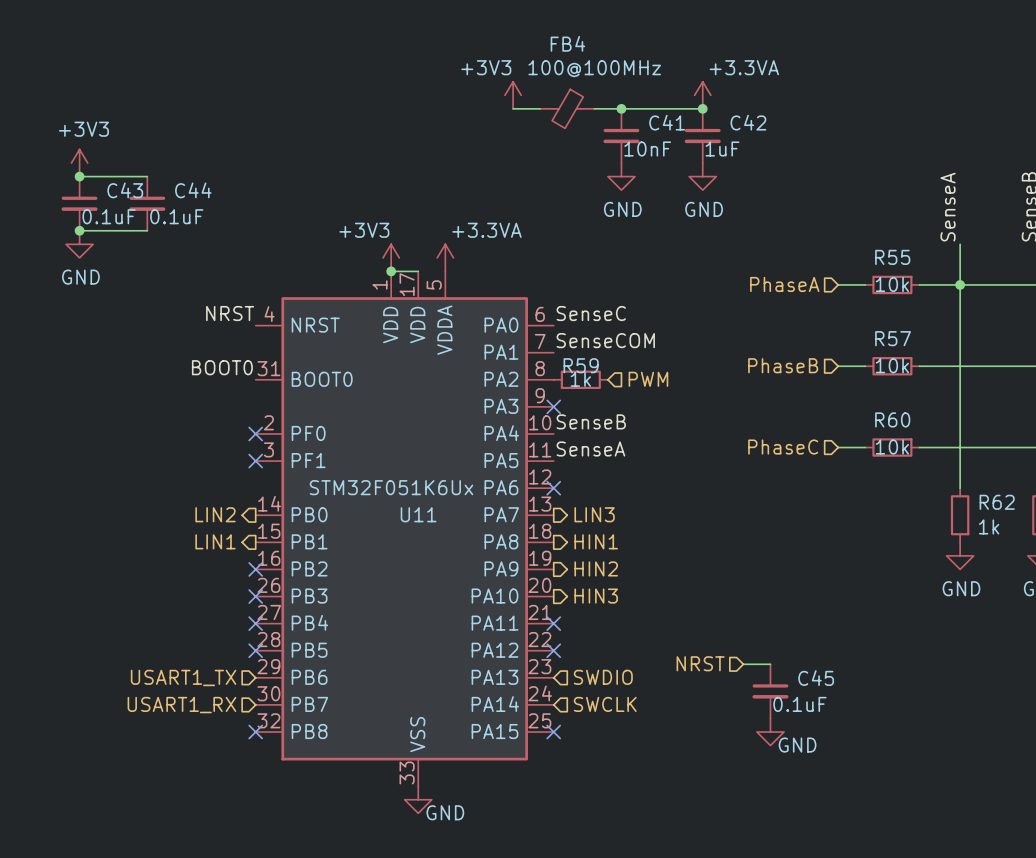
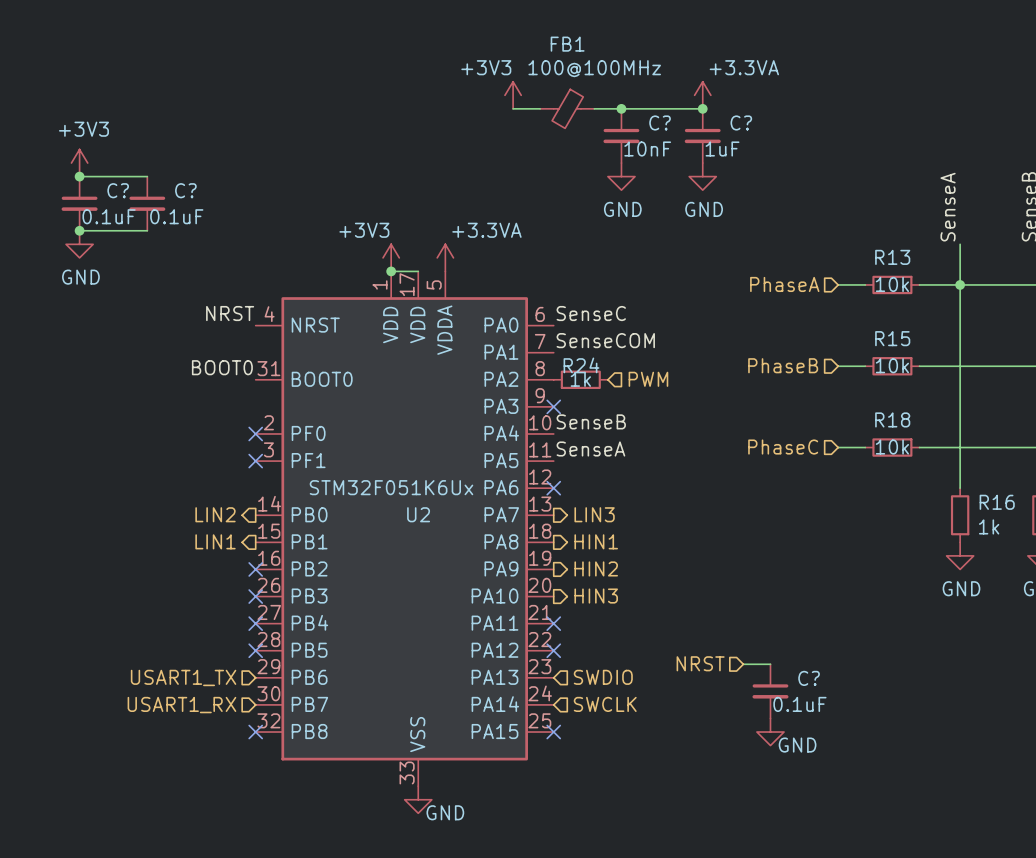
FB4 name: FB4 (567, 43) -> FB1 (567, 44)
C41 name: C41 (667, 122) -> C? (660, 122)
C42 name: C42 (748, 122) -> C? (741, 122)
C43 name: C43 (125, 190) -> C? (118, 190)
C44 name: C44 (193, 190) -> C? (185, 190)
R55 name: R55 (892, 257) -> R13 (892, 257)
R57 name: R57 (893, 338) -> R15 (892, 338)
R59 name: R59 (581, 365) -> R24 (581, 365)
R60 name: R60 (892, 419) -> R18 (892, 419)
R62 name: R62 (997, 502) -> R16 (997, 502)
U11 name: U11 (418, 514) -> U2 (418, 514)
C45 name: C45 (816, 678) -> C? (809, 678)

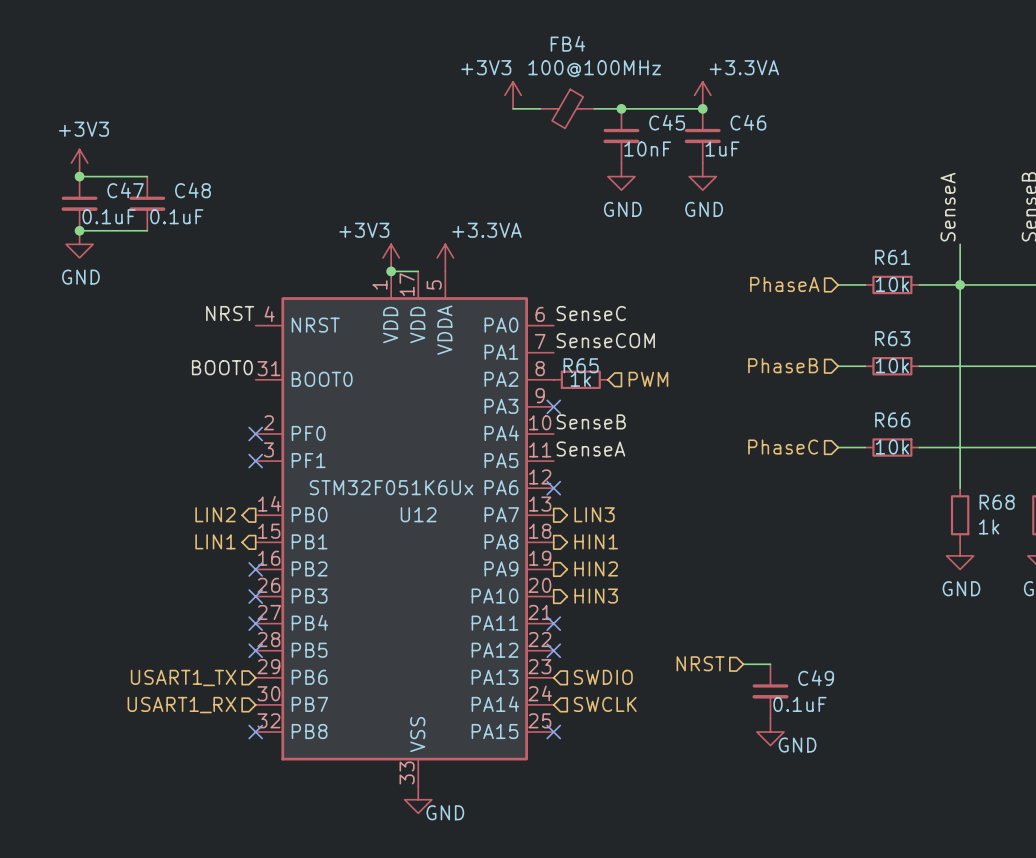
FB1 name: FB1 (567, 44) -> FB4 (567, 43)
C? name: C? (660, 122) -> C45 (667, 122)
C? name: C? (741, 122) -> C46 (748, 122)
C? name: C? (118, 190) -> C47 (125, 190)
C? name: C? (185, 190) -> C48 (192, 190)
R13 name: R13 (892, 257) -> R61 (892, 257)
R15 name: R15 (892, 338) -> R63 (892, 338)
R24 name: R24 (581, 365) -> R65 (581, 365)
R18 name: R18 (892, 419) -> R66 (892, 419)
R16 name: R16 (997, 502) -> R68 (997, 502)
U2 name: U2 (418, 514) -> U12 (418, 514)
C? name: C? (809, 678) -> C49 (816, 678)

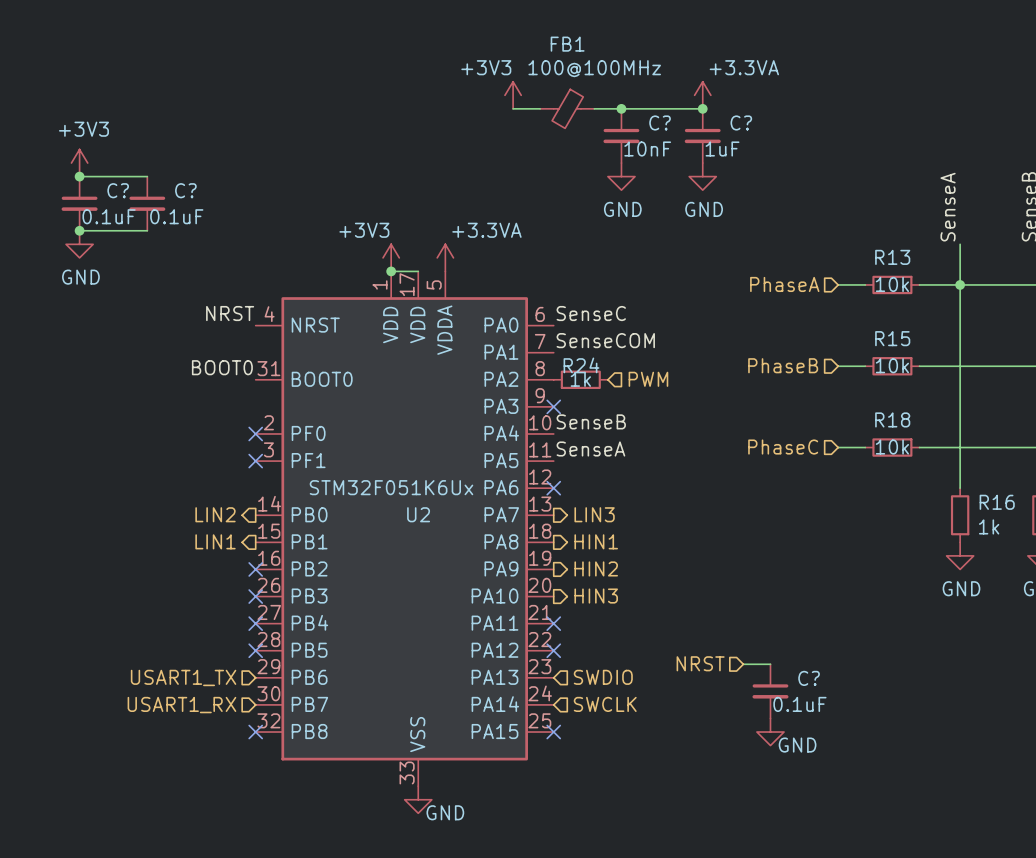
FB4 name: FB4 (567, 43) -> FB1 (567, 44)
C45 name: C45 (667, 122) -> C? (660, 122)
C46 name: C46 (748, 122) -> C? (741, 122)
C47 name: C47 (125, 190) -> C? (118, 190)
C48 name: C48 (192, 190) -> C? (185, 190)
R61 name: R61 (892, 257) -> R13 (892, 257)
R63 name: R63 (892, 338) -> R15 (892, 338)
R65 name: R65 (581, 365) -> R24 (581, 365)
R66 name: R66 (892, 419) -> R18 (892, 419)
R68 name: R68 (997, 502) -> R16 (997, 502)
U12 name: U12 (418, 514) -> U2 (418, 514)
C49 name: C49 (816, 678) -> C? (809, 678)

